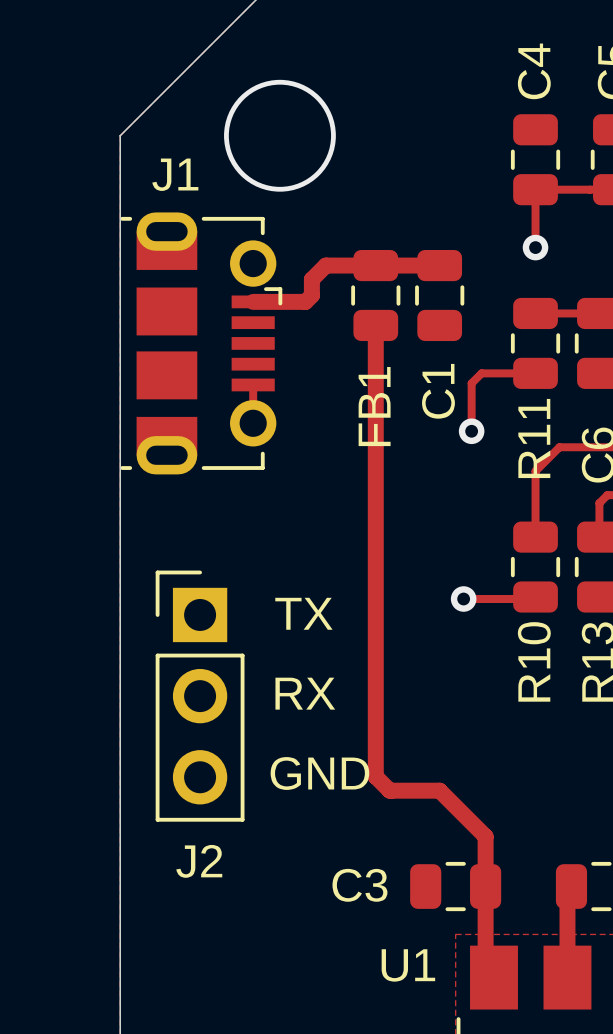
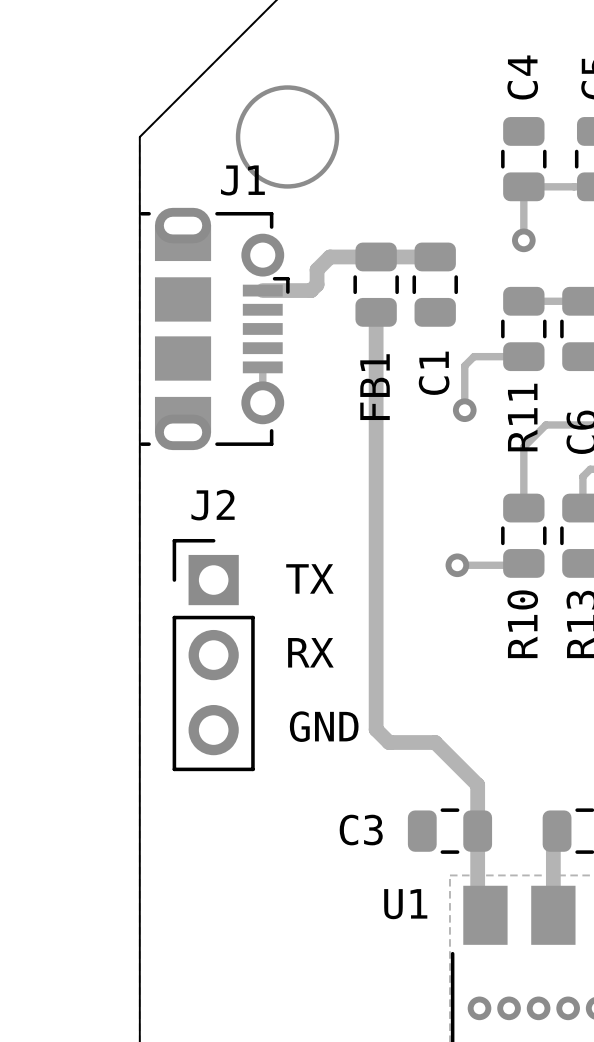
J1 name position: J1 (175, 174) -> J1 (242, 180)
J2 name position: J2 (199, 861) -> J2 (213, 505)

